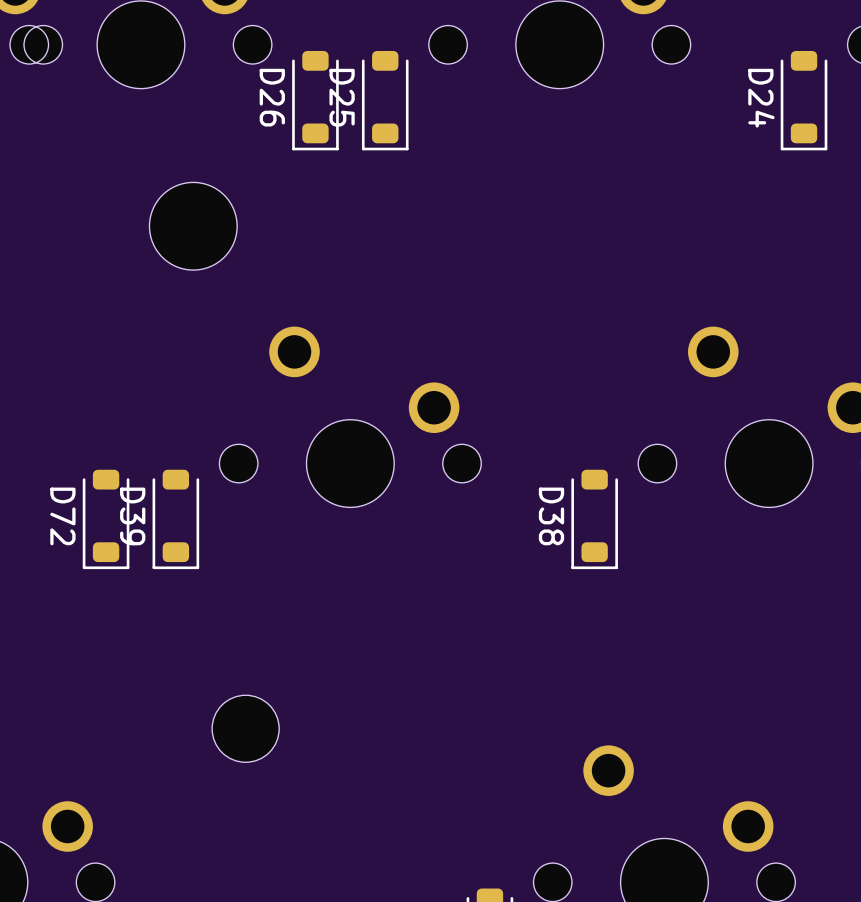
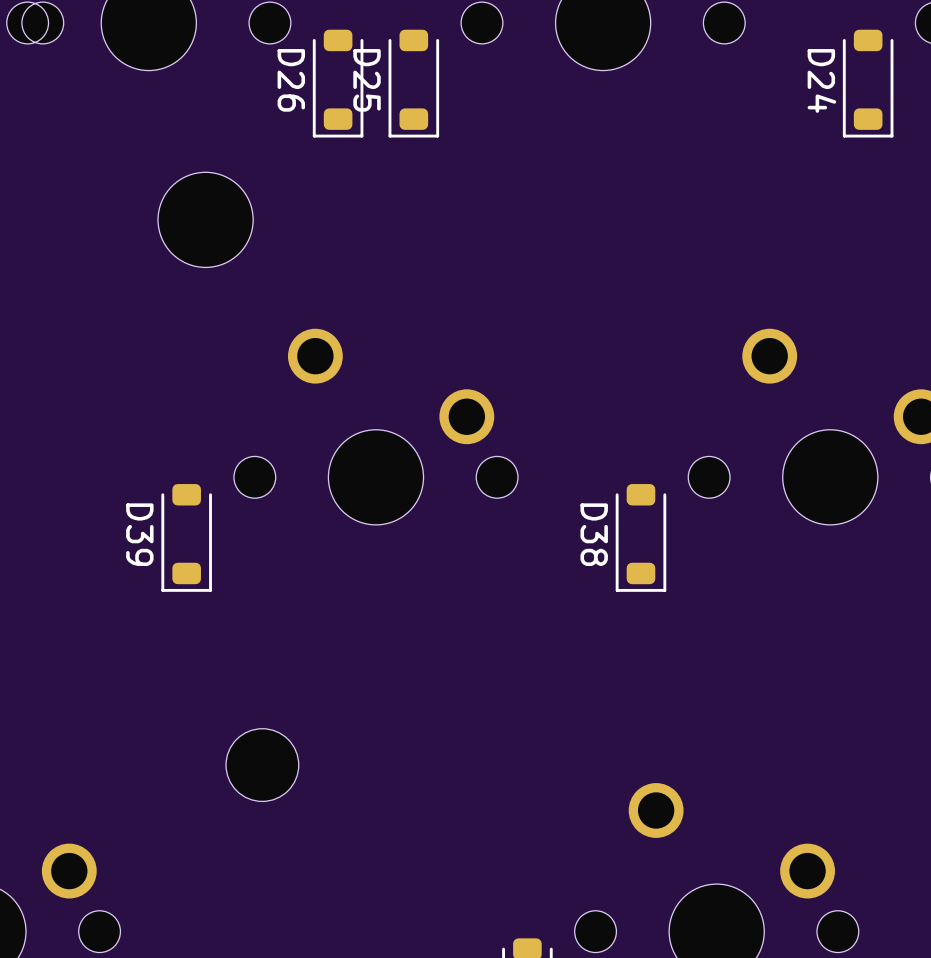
D72: (106, 519) -> none

